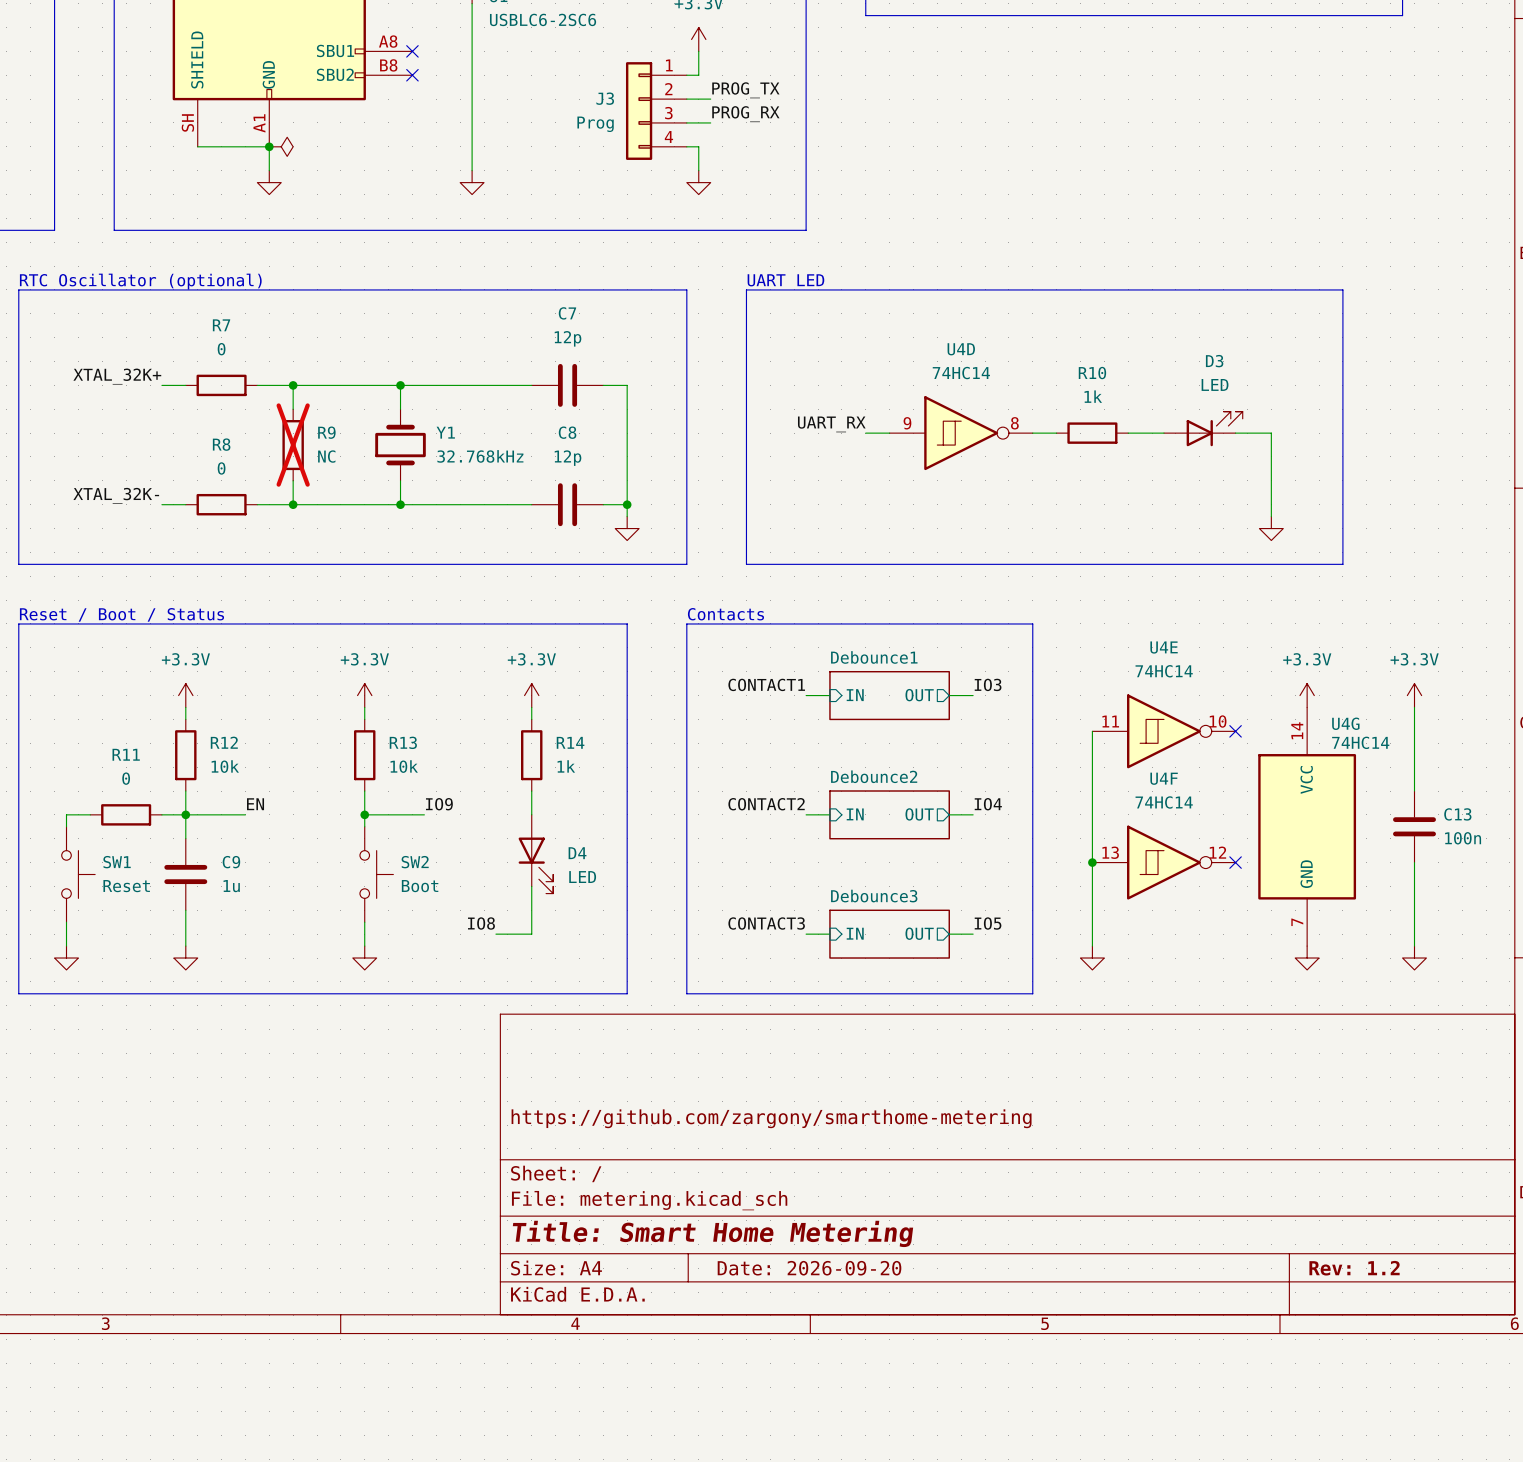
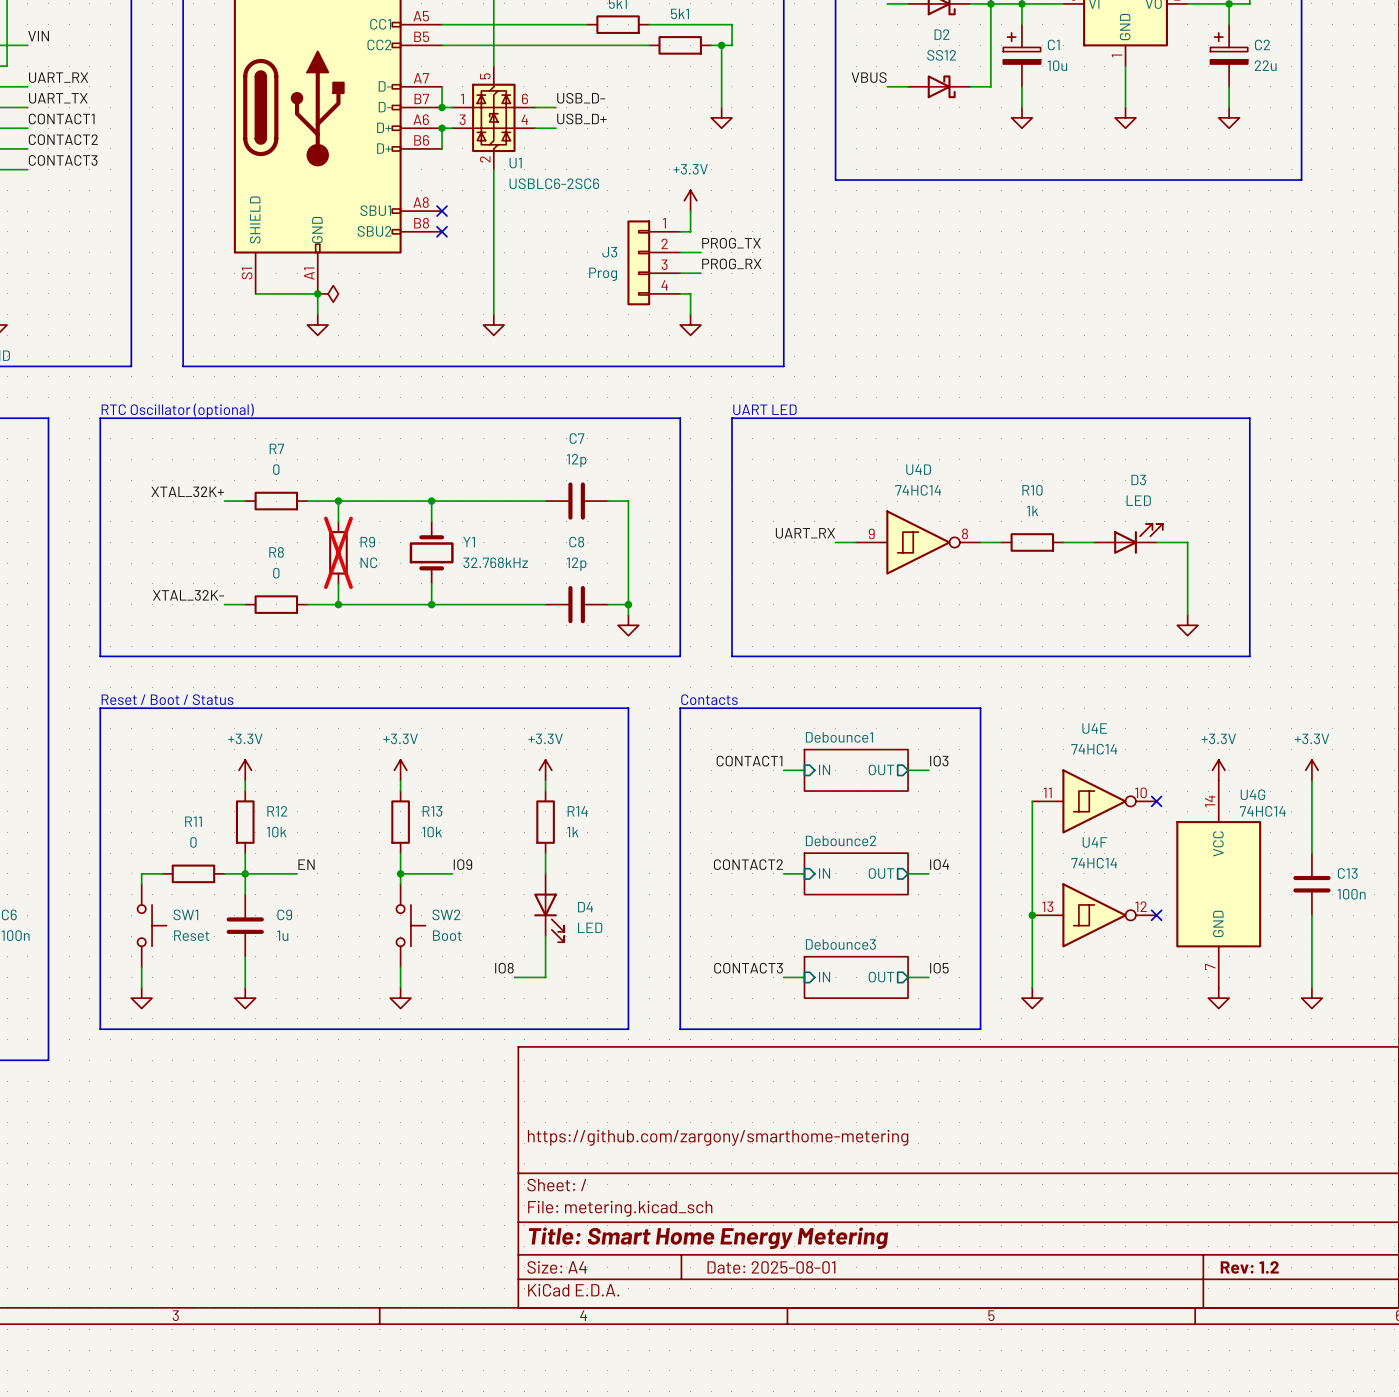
part pin number: SH (187, 122) -> S1 (247, 273)
title block: Title: Smart Home Metering (712, 1233) -> Title: Smart Home Energy Metering (708, 1238)
title block: Date: 2026-09-20 (809, 1268) -> Date: 2025-08-01 (771, 1267)

